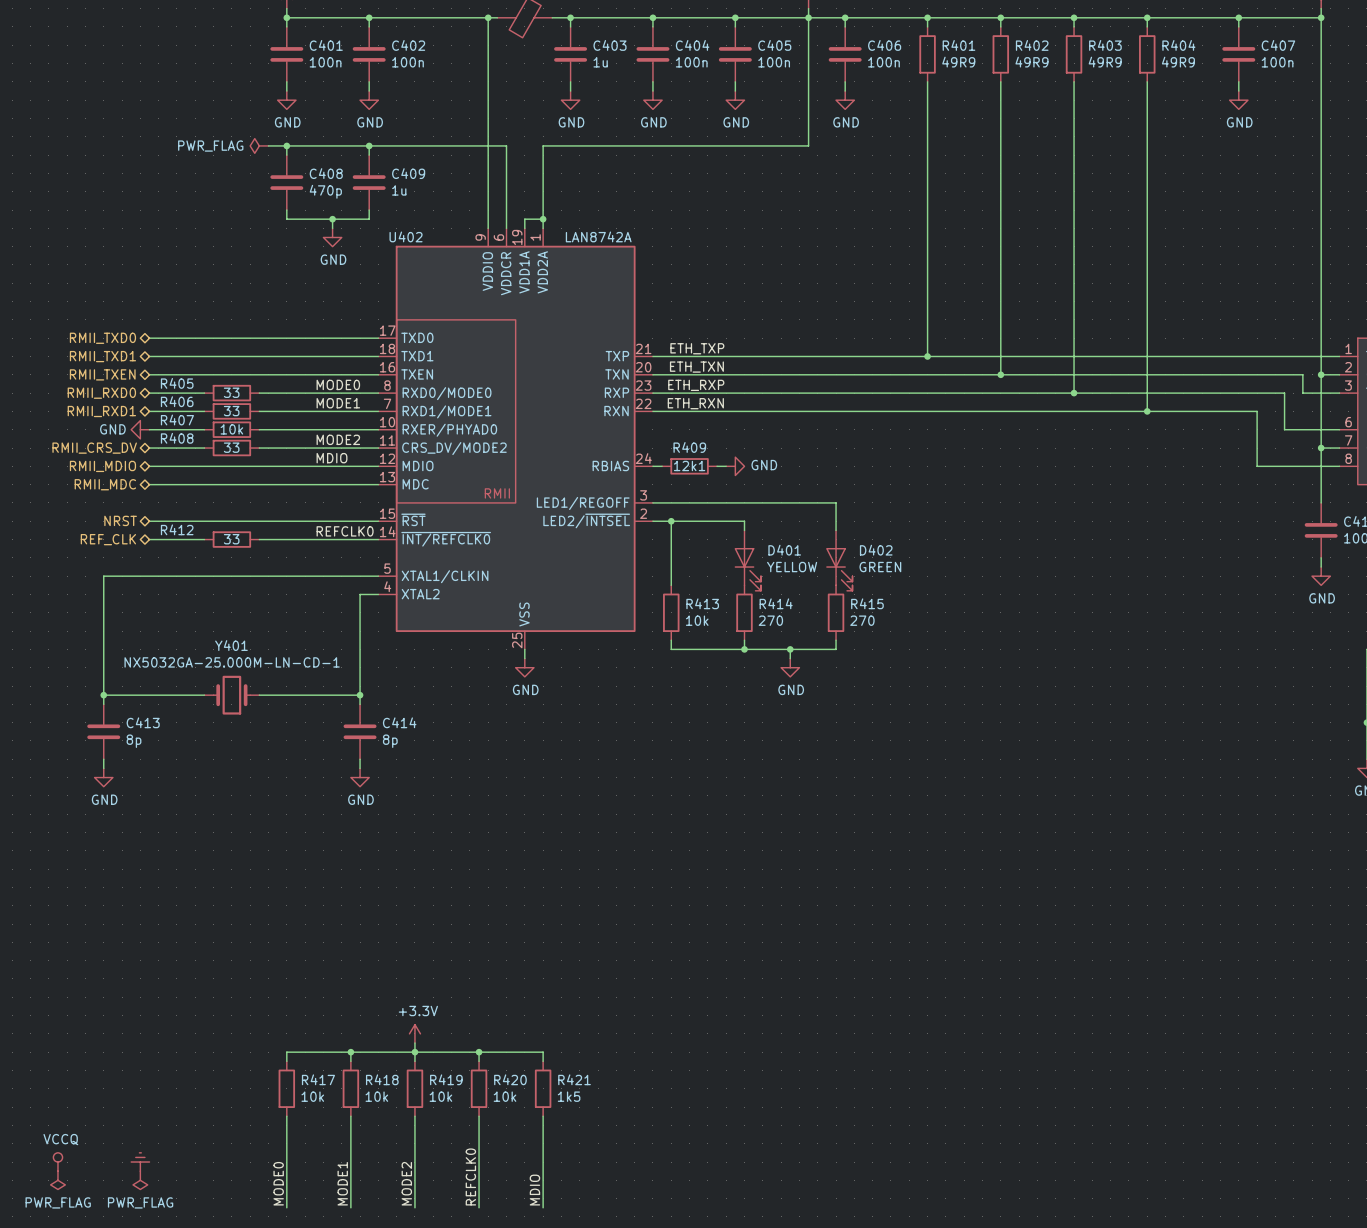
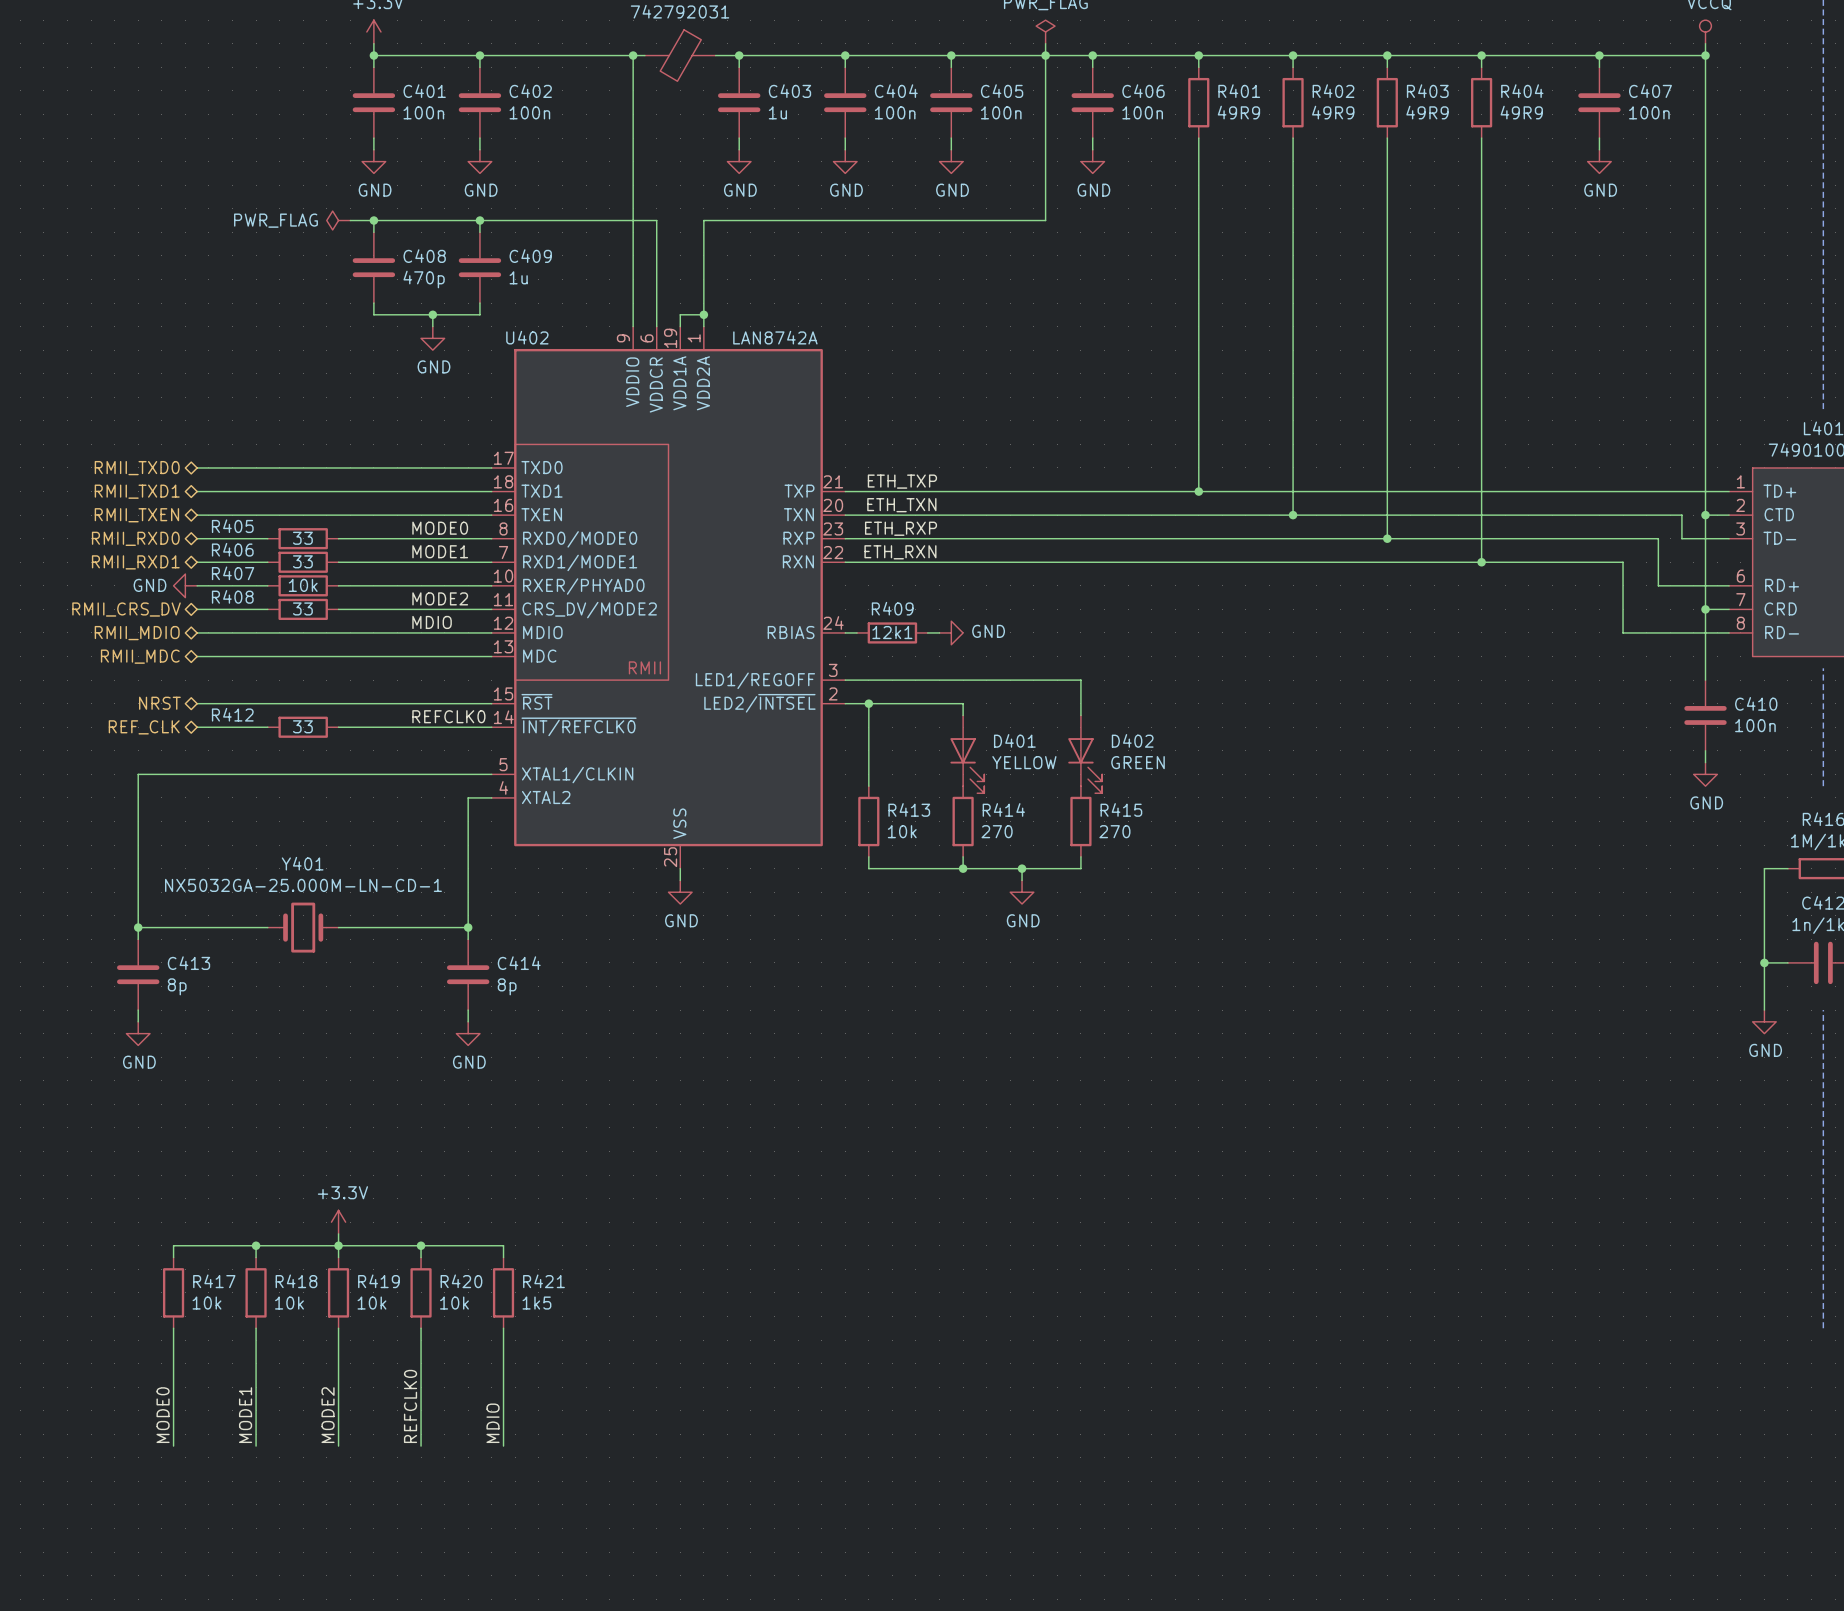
power symbol: none -> +3.3V (338, 1222)
wire: none -> (338, 1233) (338, 1257)
wire: none -> (256, 1245) (256, 1257)
junction: none -> (256, 1245)
junction: none -> (338, 1245)
junction: none -> (421, 1245)
wire: none -> (173, 1257) (173, 1245) (503, 1245) (503, 1257)
wire: none -> (173, 1328) (173, 1446)
wire: none -> (256, 1328) (256, 1446)
power symbol: +3.3V (414, 1033) -> none
wire: (414, 1043) (414, 1061) -> none
wire: (350, 1052) (350, 1061) -> (421, 1245) (421, 1257)
junction: (350, 1052) -> none
junction: (414, 1052) -> none
wire: (479, 1052) (479, 1061) -> none
junction: (479, 1052) -> none
wire: (286, 1061) (286, 1052) (543, 1052) (543, 1061) -> none
label: none -> REFCLK0 (410, 1406)
label: none -> MODE0 (163, 1415)
label: none -> MODE1 (245, 1415)
label: none -> MODE2 (328, 1415)
label: none -> MDIO (493, 1423)
R417 position: (286, 1088) -> (173, 1292)
R418 position: (350, 1088) -> (256, 1292)
R419 position: (414, 1088) -> (338, 1292)
R420 position: (479, 1088) -> (421, 1292)
R421 position: (543, 1088) -> (503, 1292)
wire: (286, 1116) (286, 1207) -> (338, 1328) (338, 1446)
wire: (350, 1116) (350, 1207) -> (421, 1328) (421, 1446)
wire: (414, 1116) (414, 1207) -> (503, 1328) (503, 1446)
wire: (479, 1116) (479, 1207) -> none
wire: (543, 1116) (543, 1207) -> none
power symbol: VCCQ (57, 1162) -> none
power symbol: (140, 1162) -> none
label: REFCLK0 (470, 1176) -> none
power symbol: PWR_FLAG (57, 1180) -> none
power symbol: PWR_FLAG (140, 1180) -> none
label: MODE0 (278, 1183) -> none
label: MODE1 (342, 1183) -> none
label: MODE2 (406, 1183) -> none
label: MDIO (534, 1190) -> none

